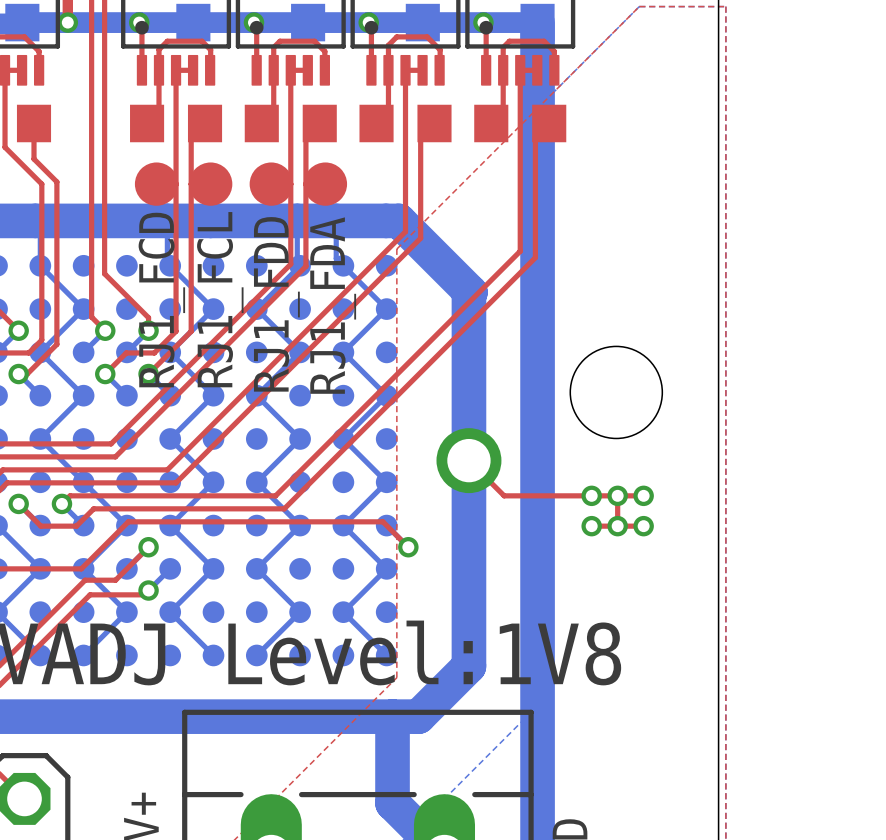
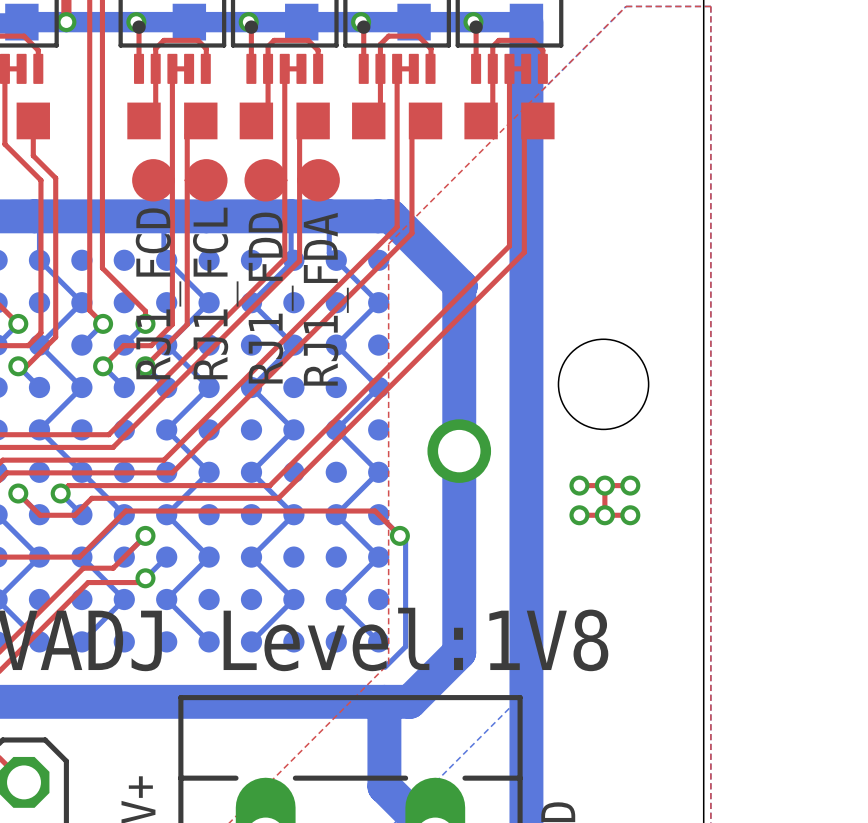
top track: (468, 460) (504, 495) (591, 495) -> none
bottom track: none -> (399, 535) (405, 541) (405, 646) (384, 667)

